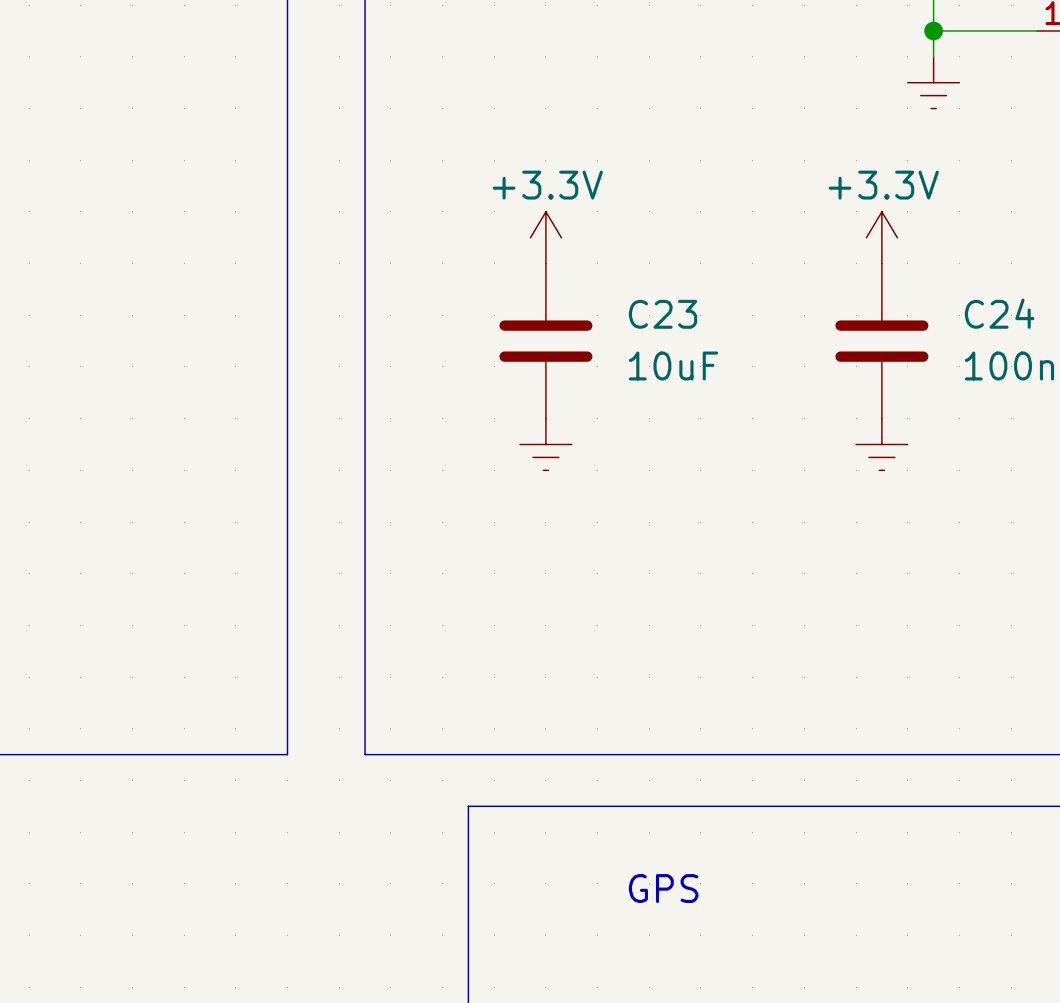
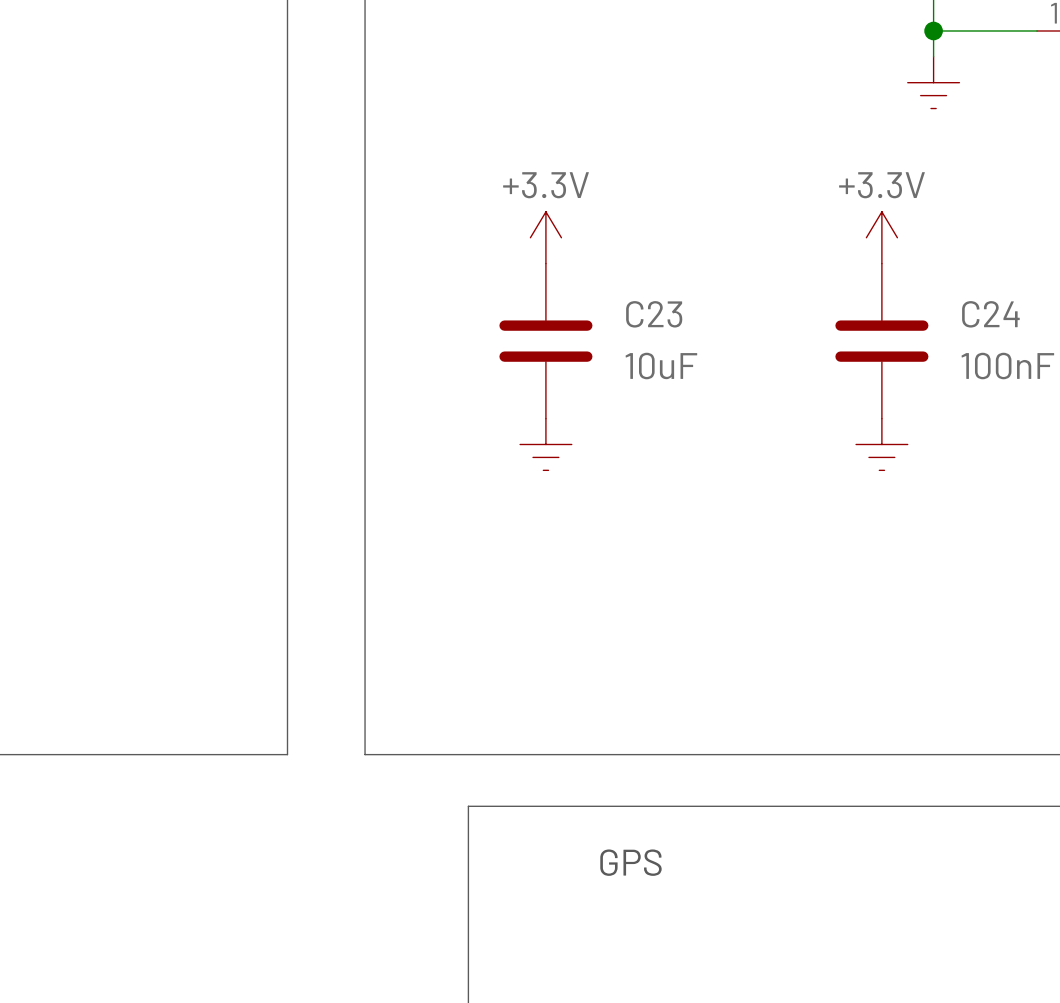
text position: GPS (663, 888) -> GPS (630, 862)

